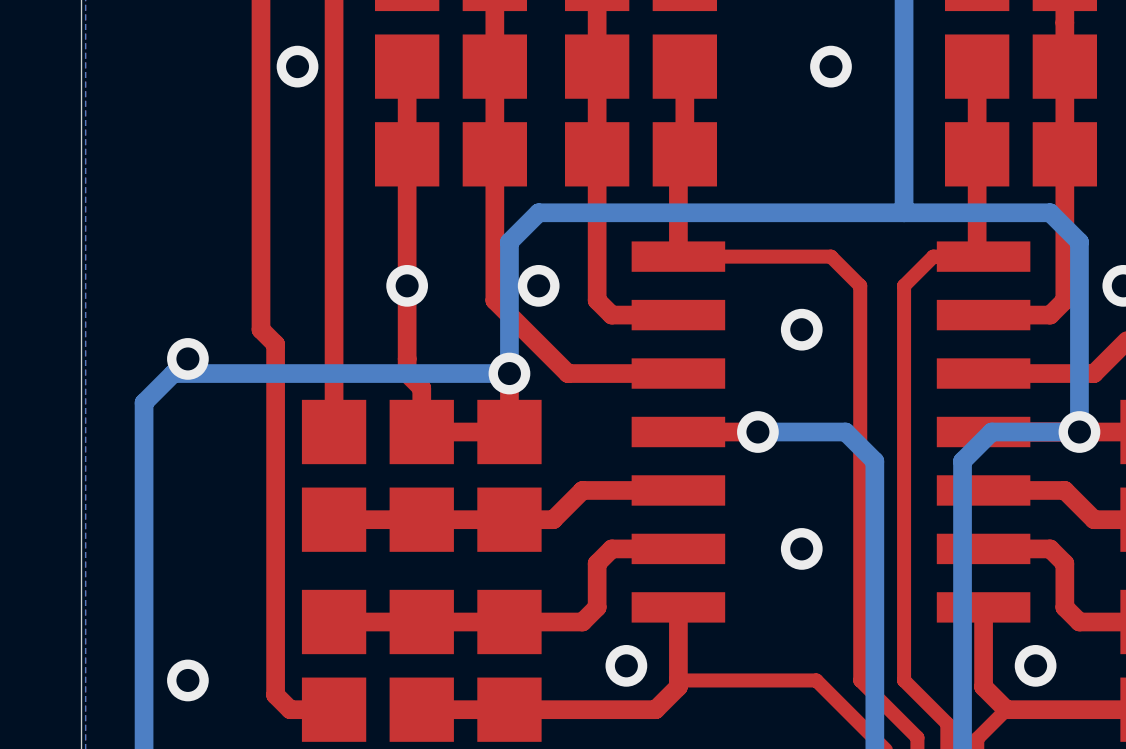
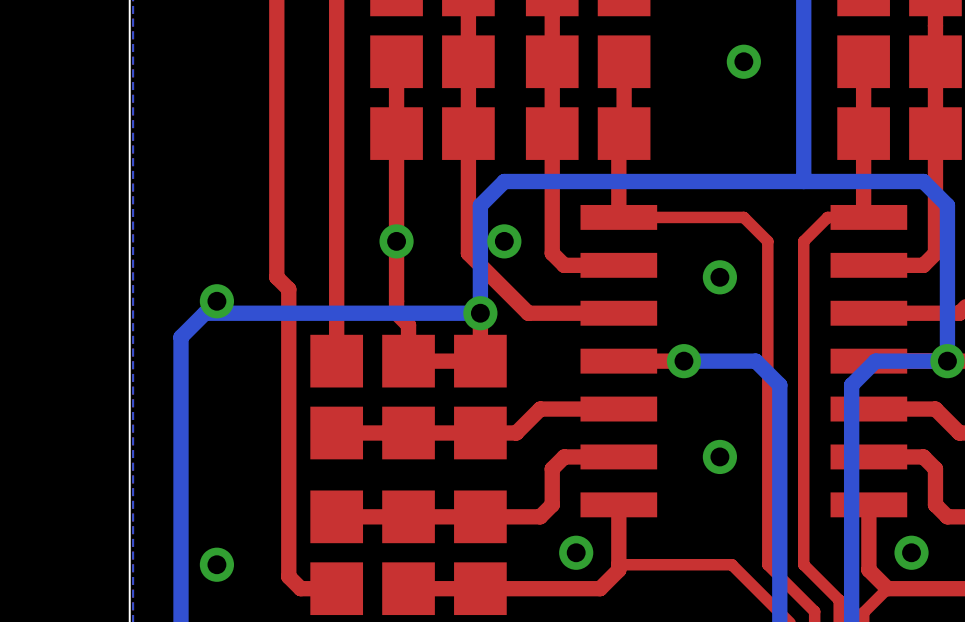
via: (297, 66) -> none

